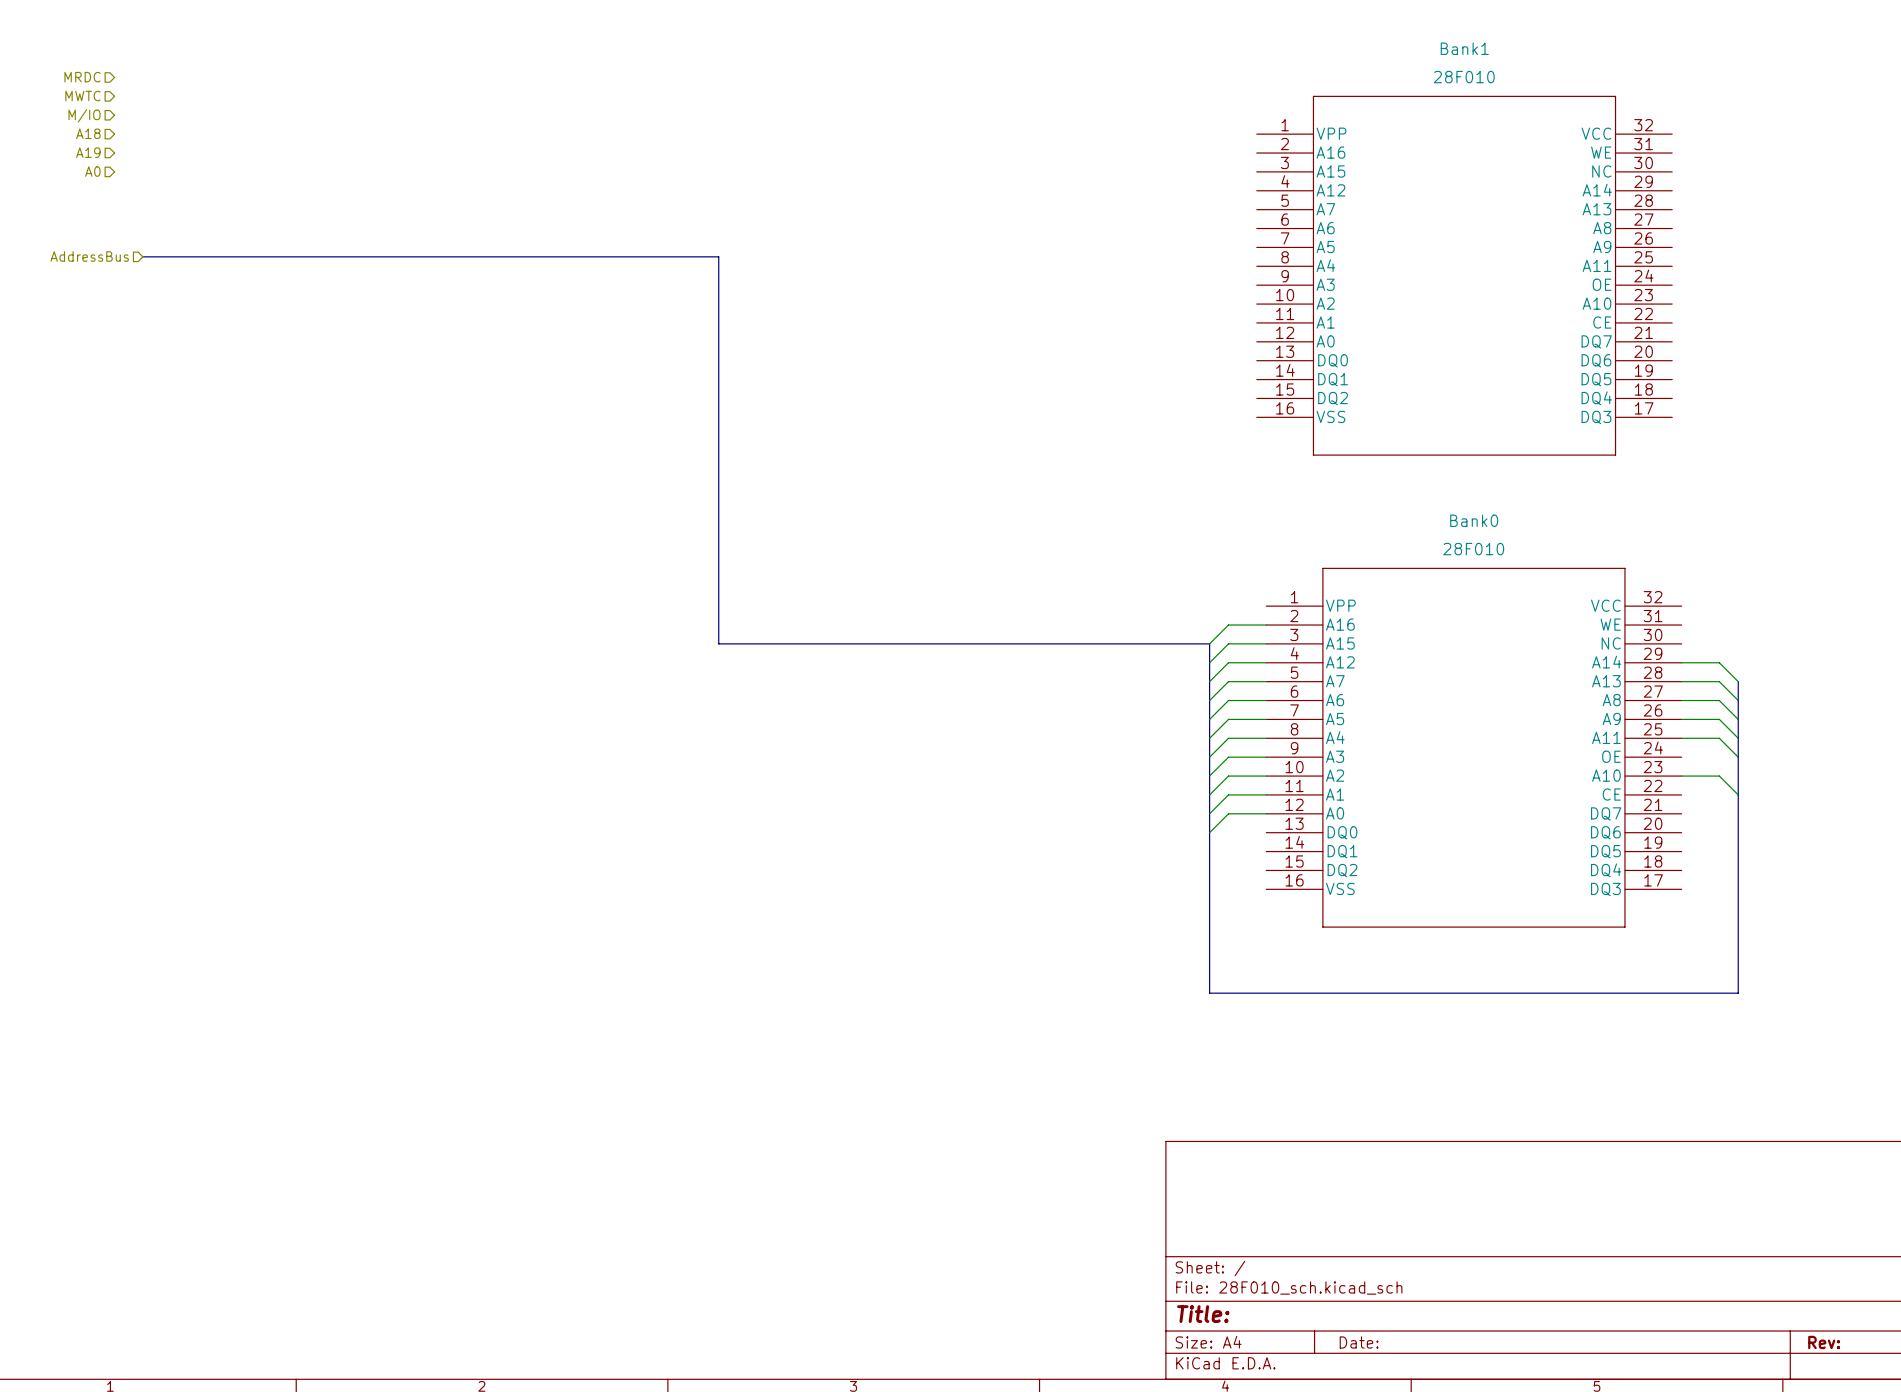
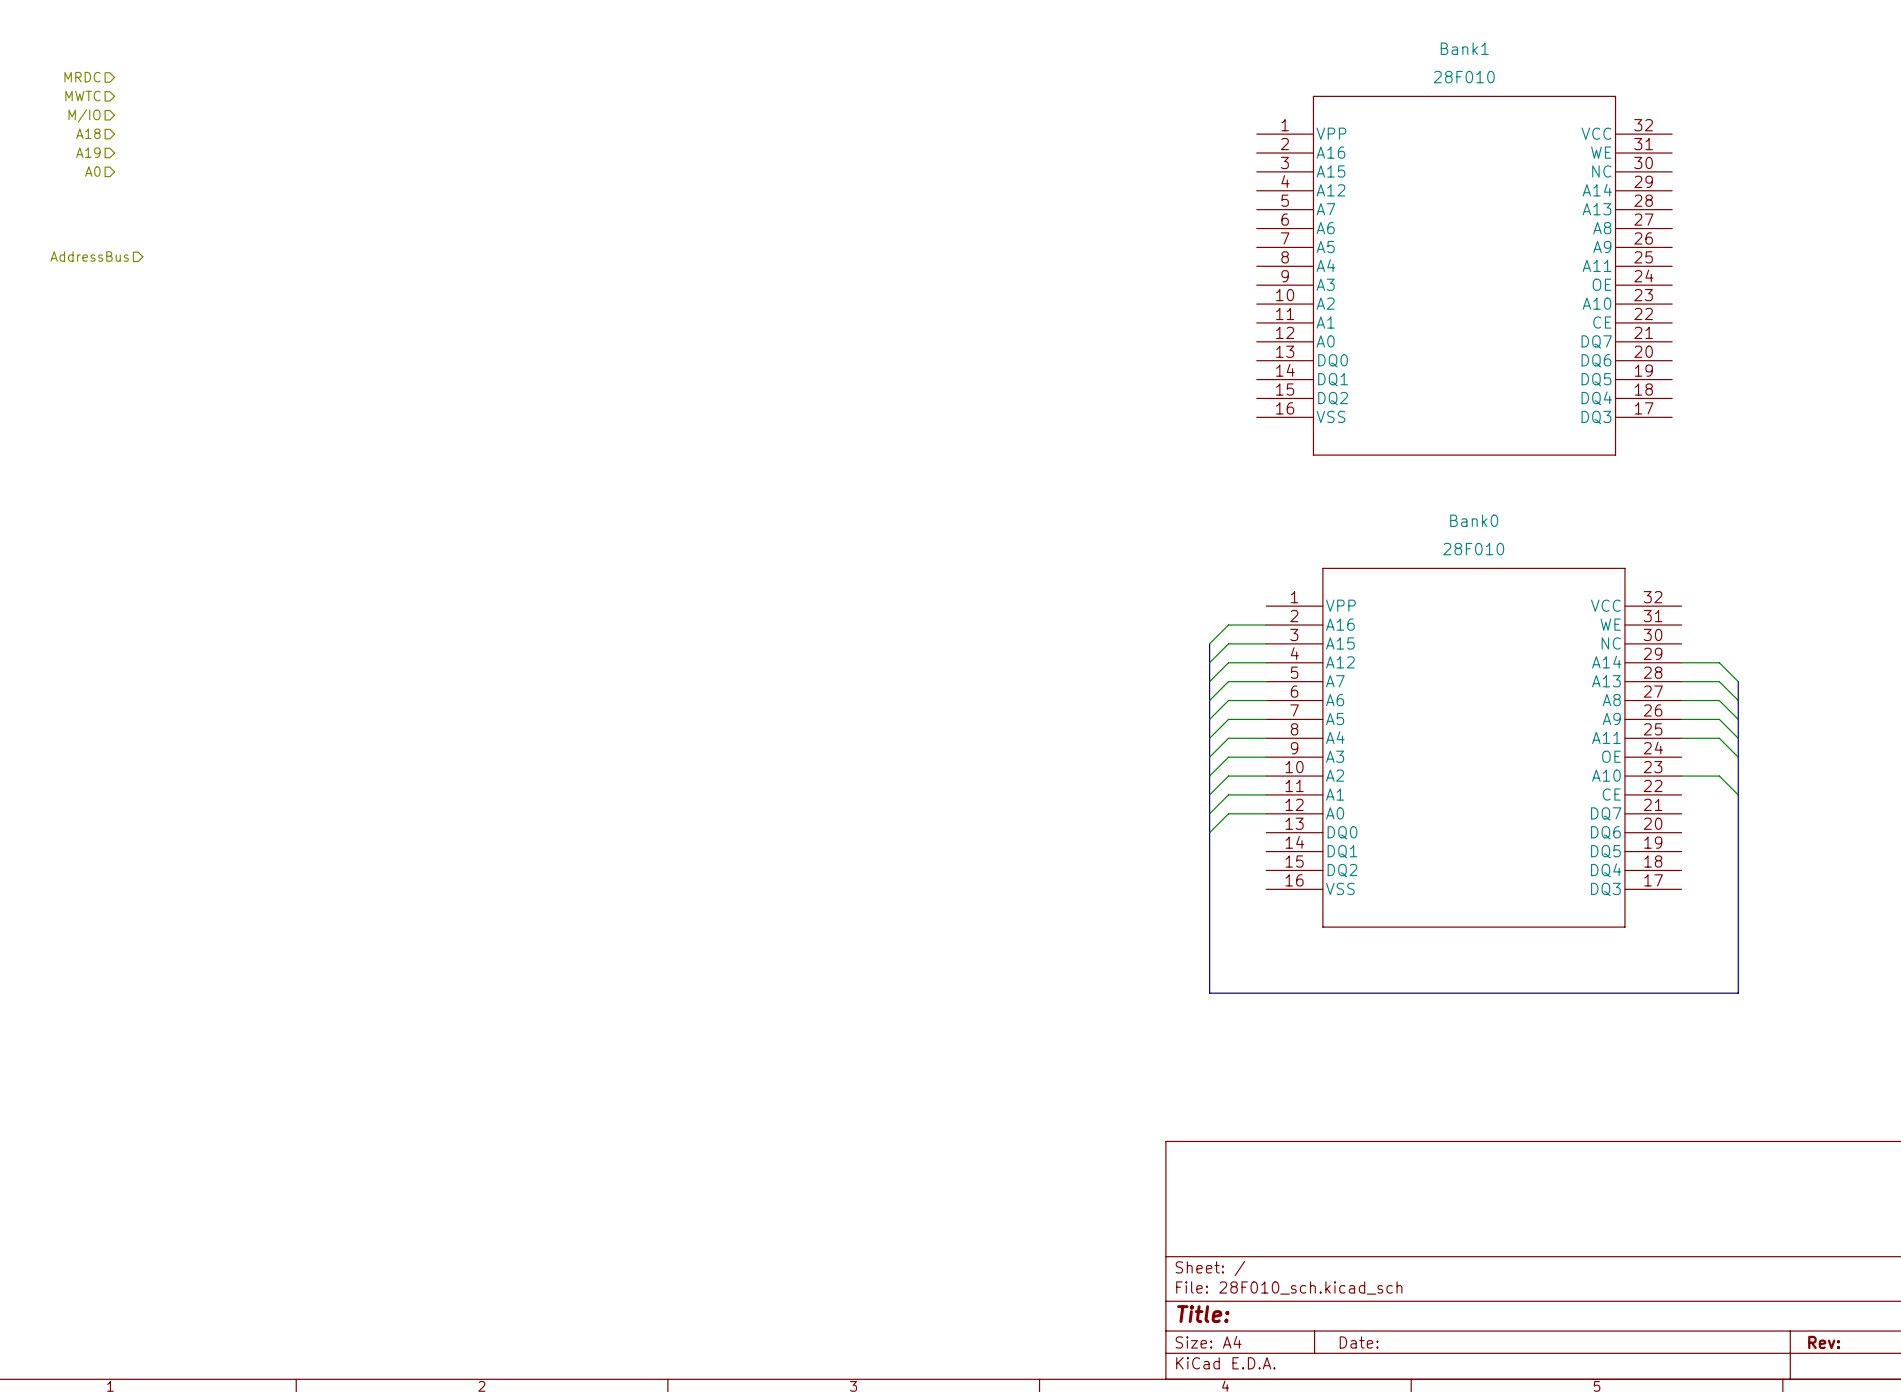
bus: (142, 256) (718, 256) (718, 643) (1209, 643) -> none

